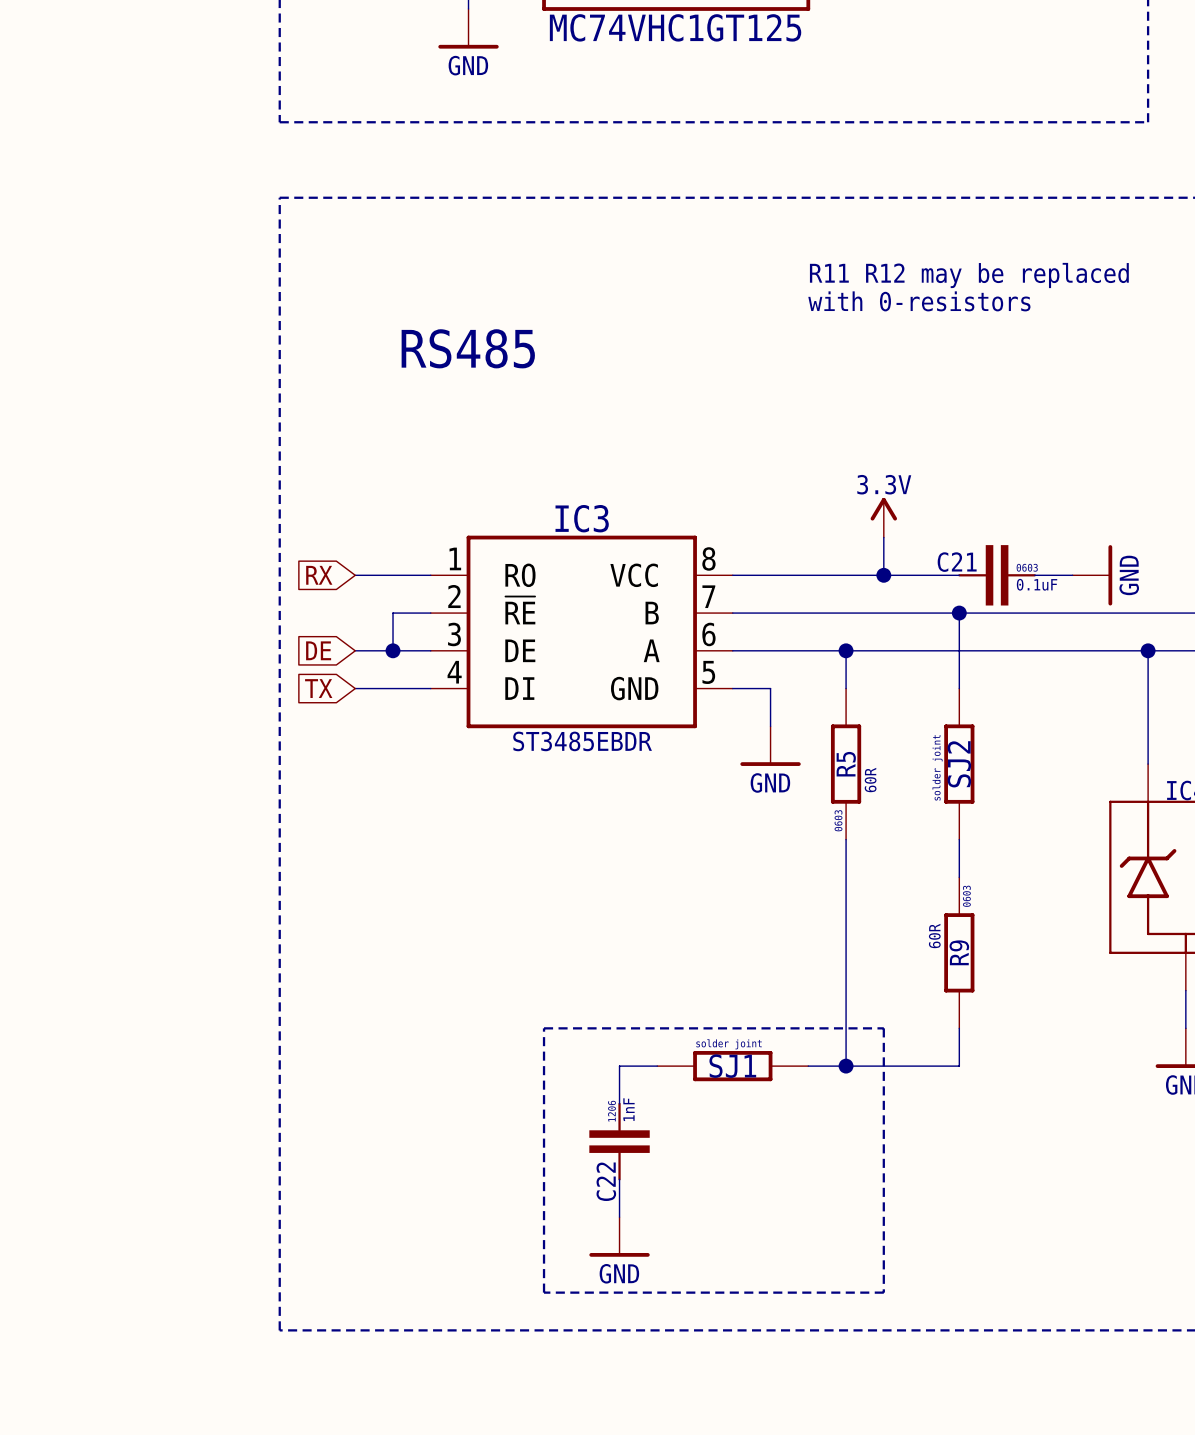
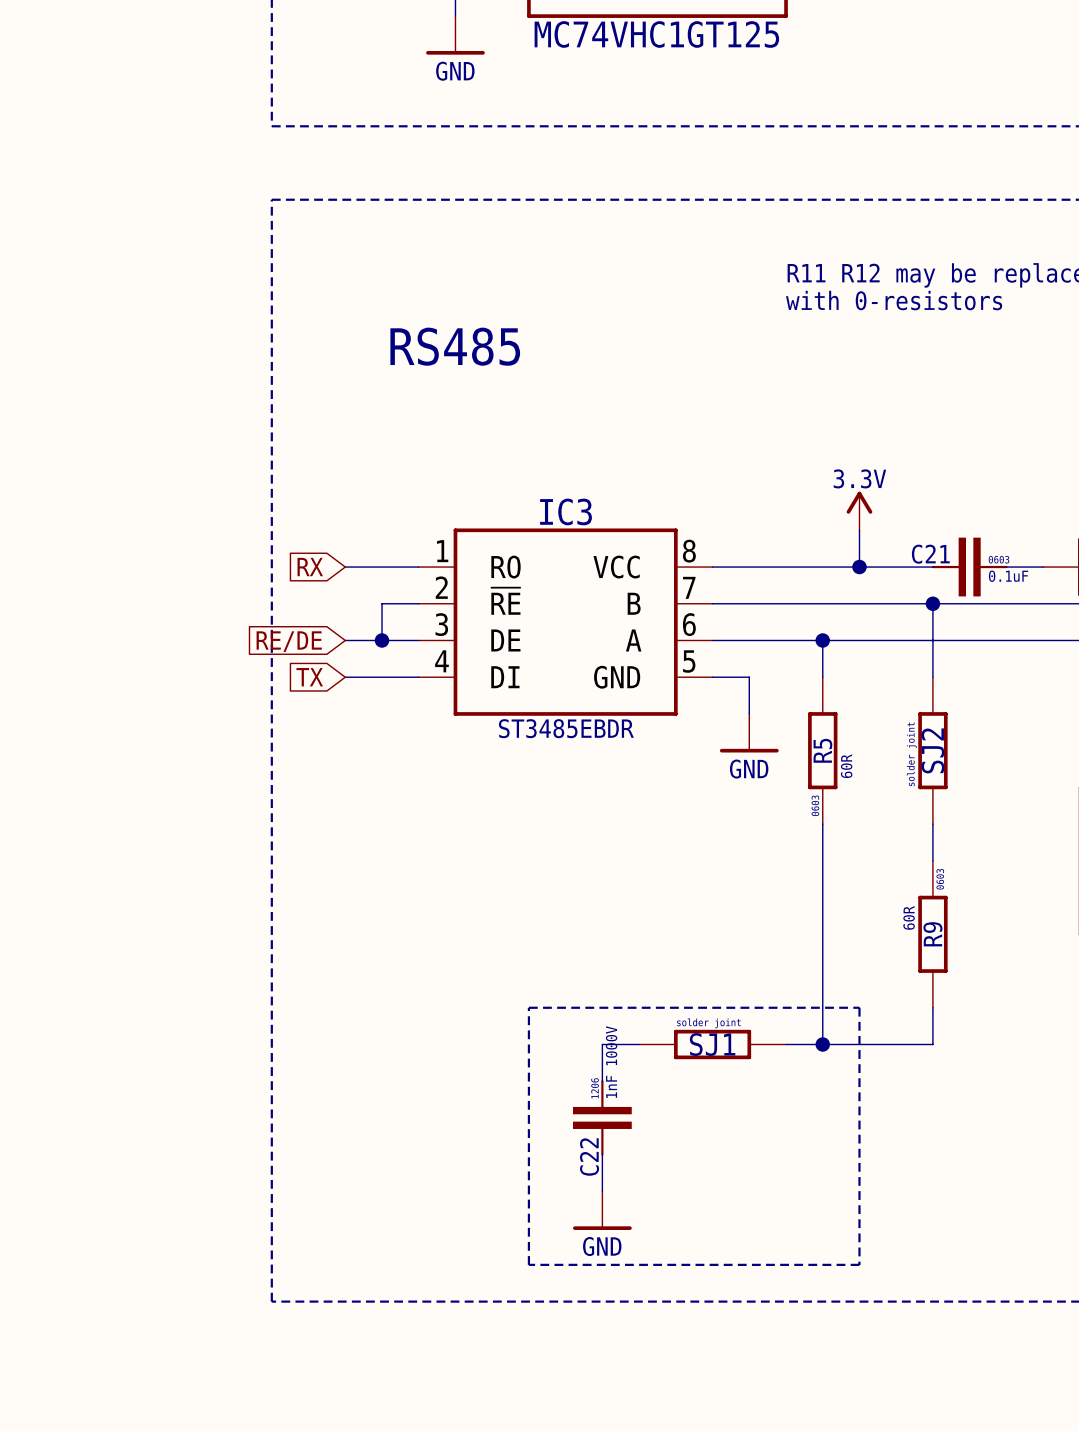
global label: DE (318, 650) -> RE/DE (289, 641)
C22 value: 1nF (628, 1109) -> 1nF 1000V (611, 1062)

